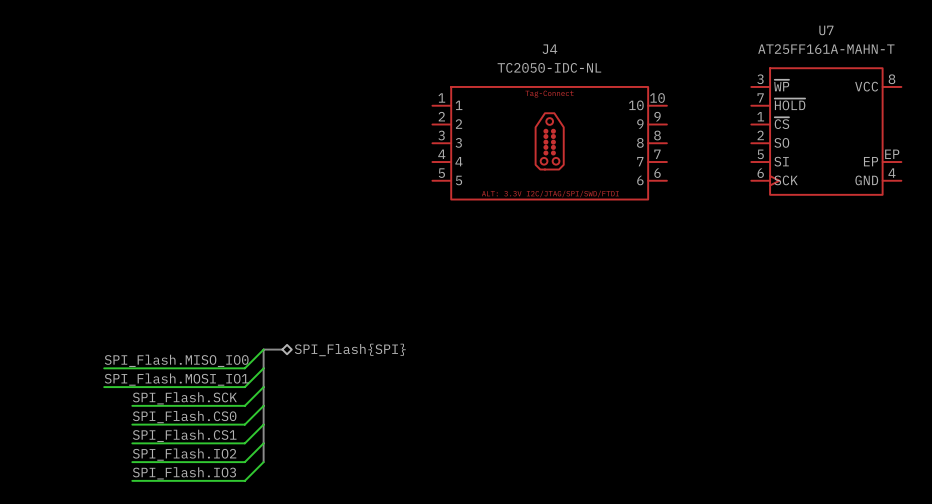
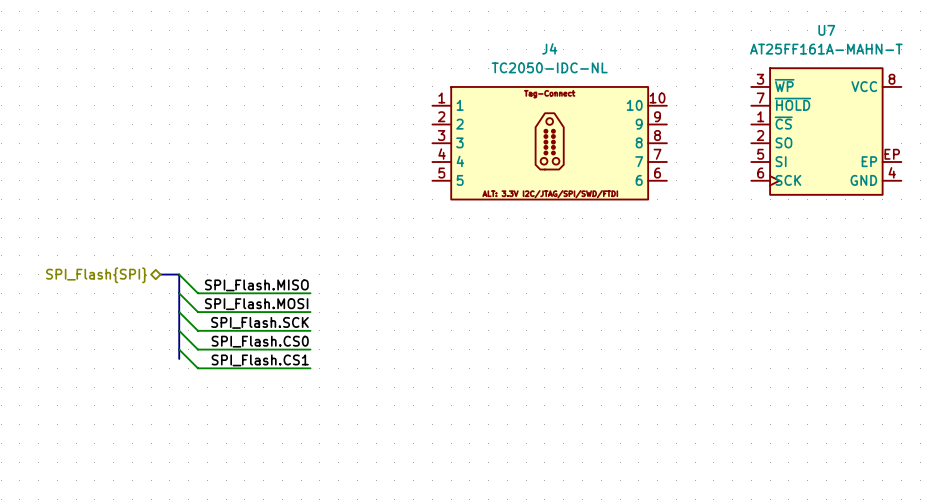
bus: none -> (160, 274) (179, 274) (179, 358)
wire: none -> (179, 274) (197, 293) (310, 293)
label: none -> SPI_Flash.MISO (256, 285)
wire: none -> (179, 293) (197, 312) (310, 312)
label: none -> SPI_Flash.MOSI (256, 304)
wire: none -> (179, 312) (197, 330) (310, 330)
label: none -> SPI_Flash.SCK (259, 322)
wire: none -> (179, 330) (197, 349) (310, 349)
label: none -> SPI_Flash.CS0 (260, 341)
wire: (263, 349) (244, 368) -> (310, 368) (244, 368)
bus: (282, 349) (263, 349) (263, 462) -> none
hierarchical label rotation: 0° (350, 349) -> 180° (96, 275)
hierarchical label position: SPI_Flash{SPI} (350, 349) -> SPI_Flash{SPI} (96, 275)
label: SPI_Flash.MISO_IO0 (176, 360) -> none
label: none -> SPI_Flash.CS1 (260, 360)
wire: (104, 368) (197, 368) -> (179, 349) (197, 368)
wire: (263, 368) (244, 387) (104, 387) -> none
label: SPI_Flash.MOSI_IO1 (176, 379) -> none
wire: (263, 387) (244, 405) (132, 405) -> none
label: SPI_Flash.SCK (184, 398) -> none
wire: (263, 405) (244, 424) (132, 424) -> none
label: SPI_Flash.CS0 (184, 417) -> none
wire: (263, 424) (244, 443) (132, 443) -> none
label: SPI_Flash.CS1 (184, 435) -> none
wire: (263, 443) (244, 462) (132, 462) -> none
label: SPI_Flash.IO2 (184, 454) -> none
wire: (263, 462) (244, 480) (132, 480) -> none
label: SPI_Flash.IO3 (184, 473) -> none

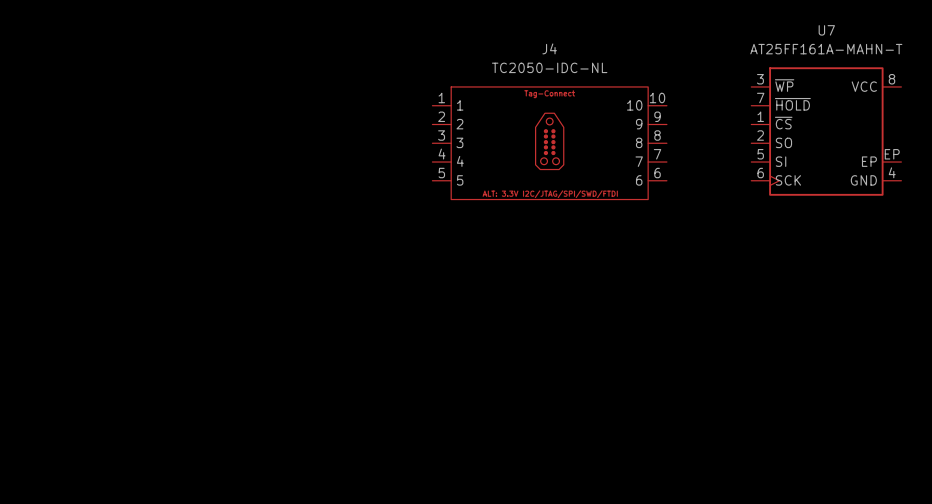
bus: (160, 274) (179, 274) (179, 358) -> none
wire: (179, 274) (197, 293) (310, 293) -> none
hierarchical label: SPI_Flash{SPI} (96, 275) -> none
label: SPI_Flash.MISO (256, 285) -> none
wire: (179, 293) (197, 312) (310, 312) -> none
label: SPI_Flash.MOSI (256, 304) -> none
wire: (179, 312) (197, 330) (310, 330) -> none
label: SPI_Flash.SCK (259, 322) -> none
wire: (179, 330) (197, 349) (310, 349) -> none
label: SPI_Flash.CS0 (260, 341) -> none
wire: (179, 349) (197, 368) (310, 368) -> none
label: SPI_Flash.CS1 (260, 360) -> none

